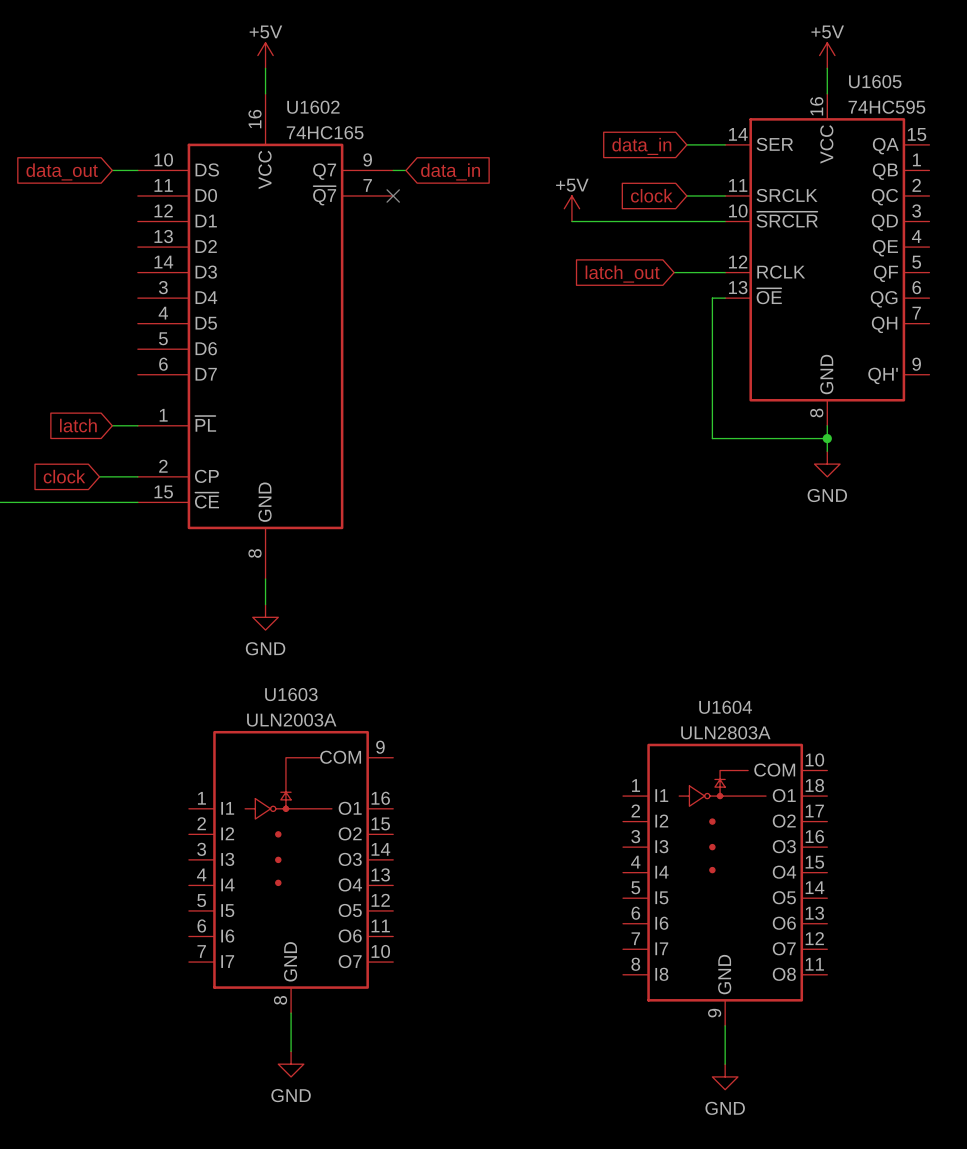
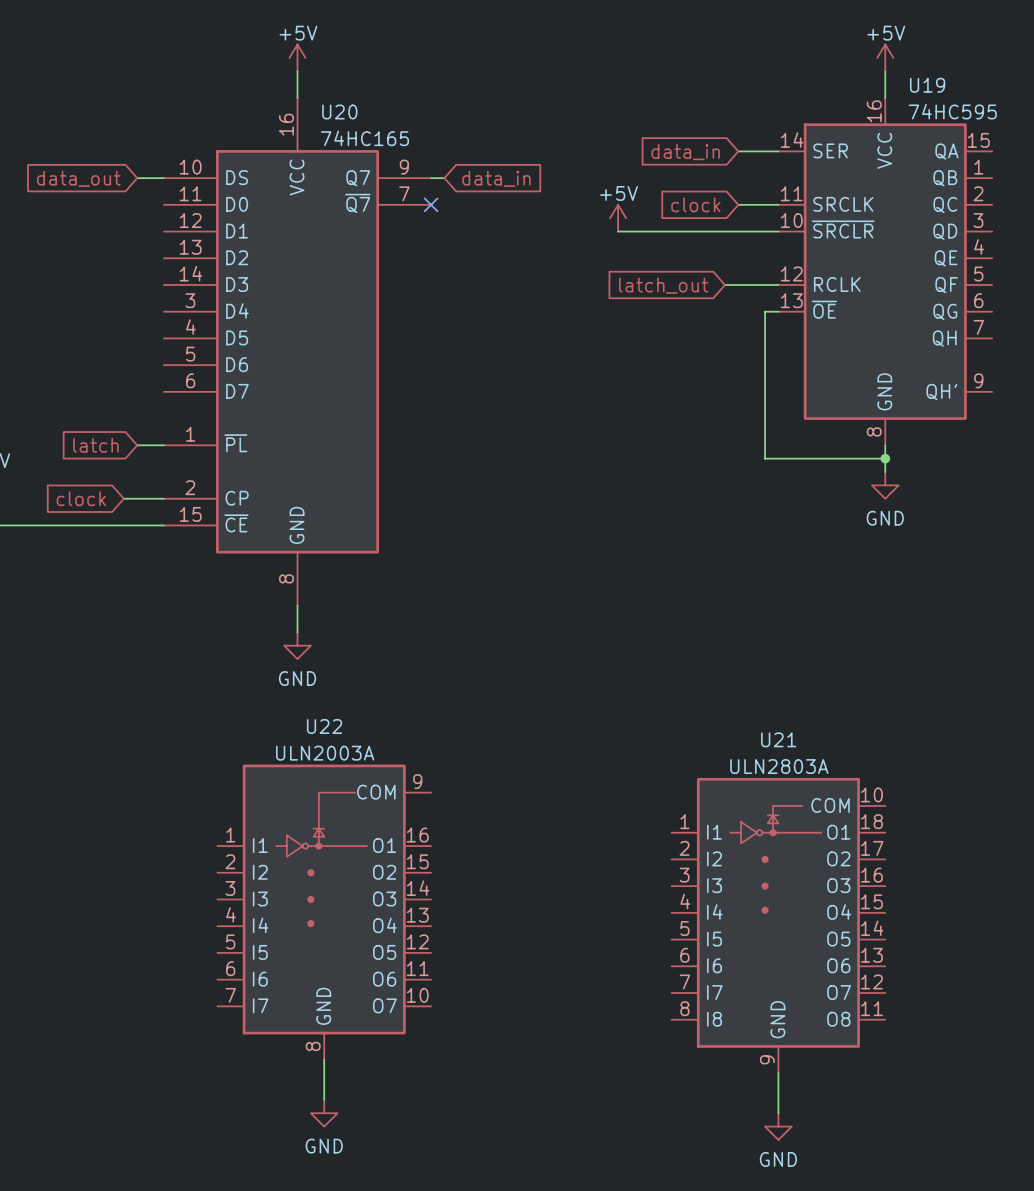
U1605 name: U1605 (875, 81) -> U19 (927, 85)
U1602 name: U1602 (313, 107) -> U20 (339, 111)
U1603 name: U1603 (291, 694) -> U22 (324, 726)
U1604 name: U1604 (725, 707) -> U21 (778, 739)

